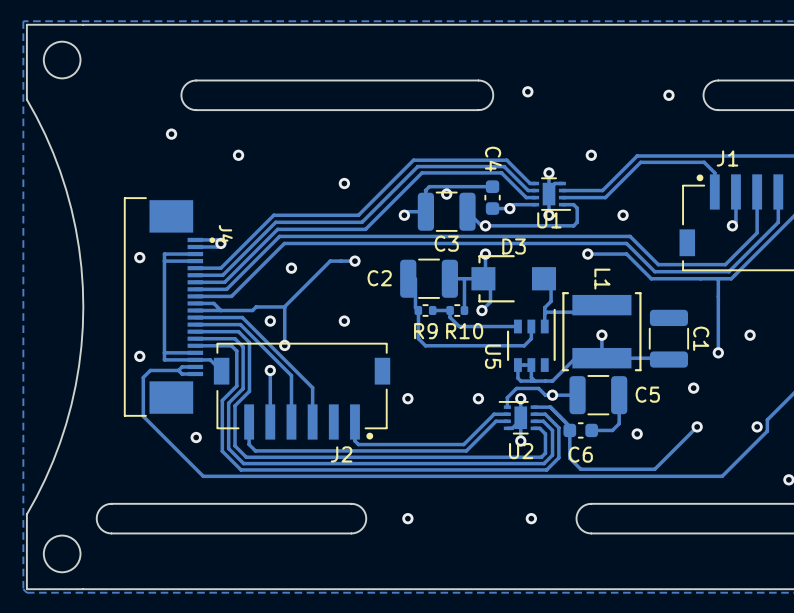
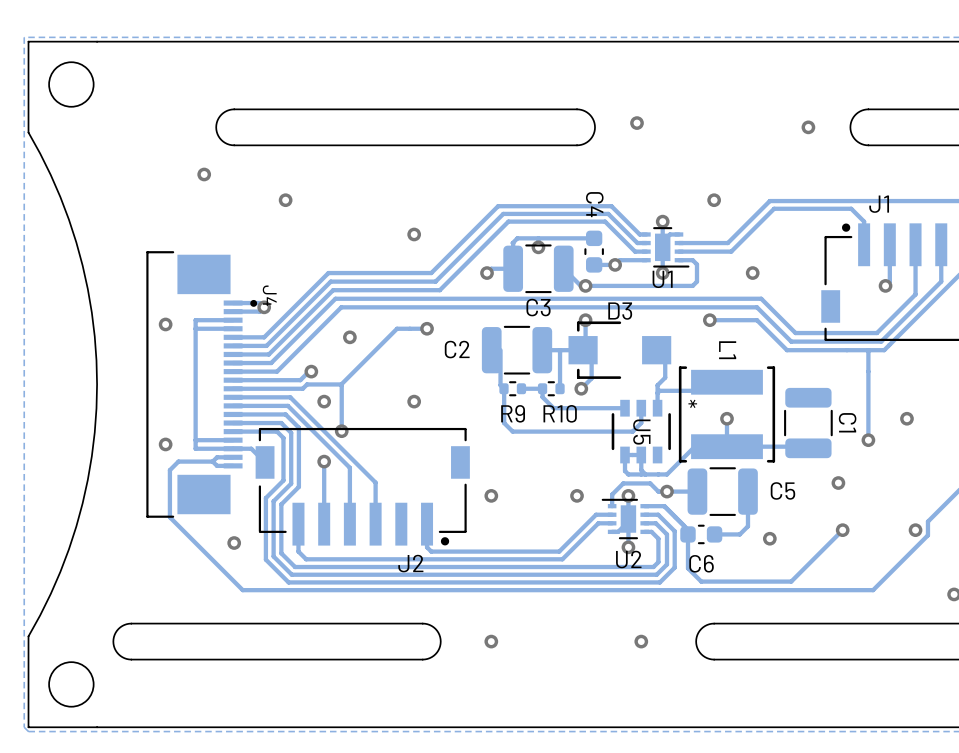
via: none -> (311, 371)
track: (213, 303) (220, 310) -> (255, 380) (300, 380) (311, 371)
U5 footprint: [506, 308, 556, 372] -> [611, 399, 671, 464]
U5 name position: U5 (493, 356) -> U5 (641, 432)

